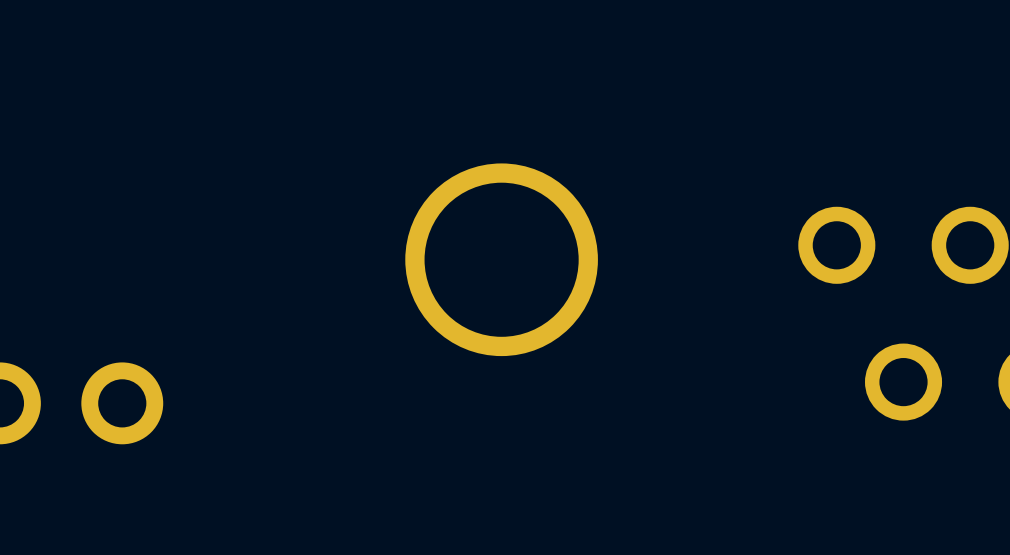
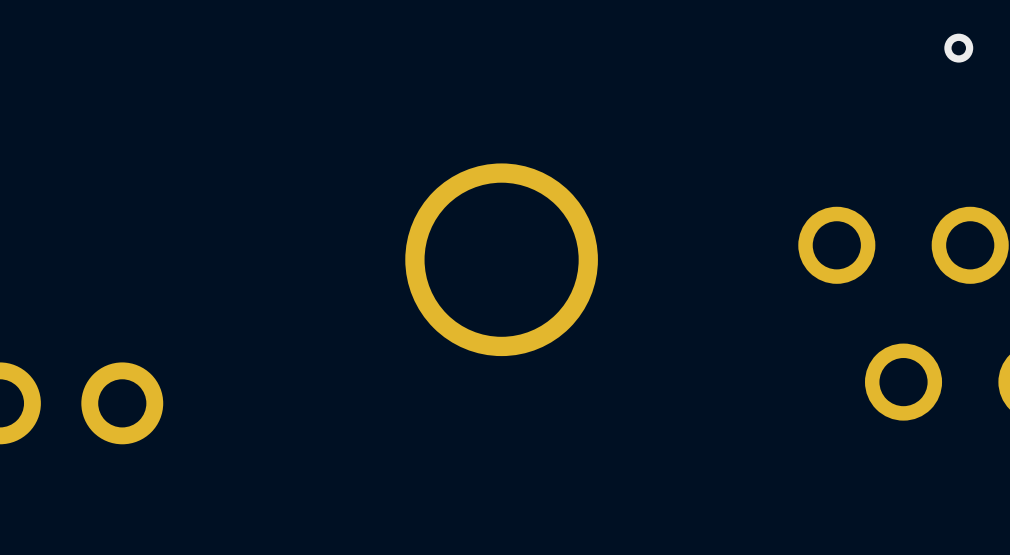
via: none -> (958, 48)

